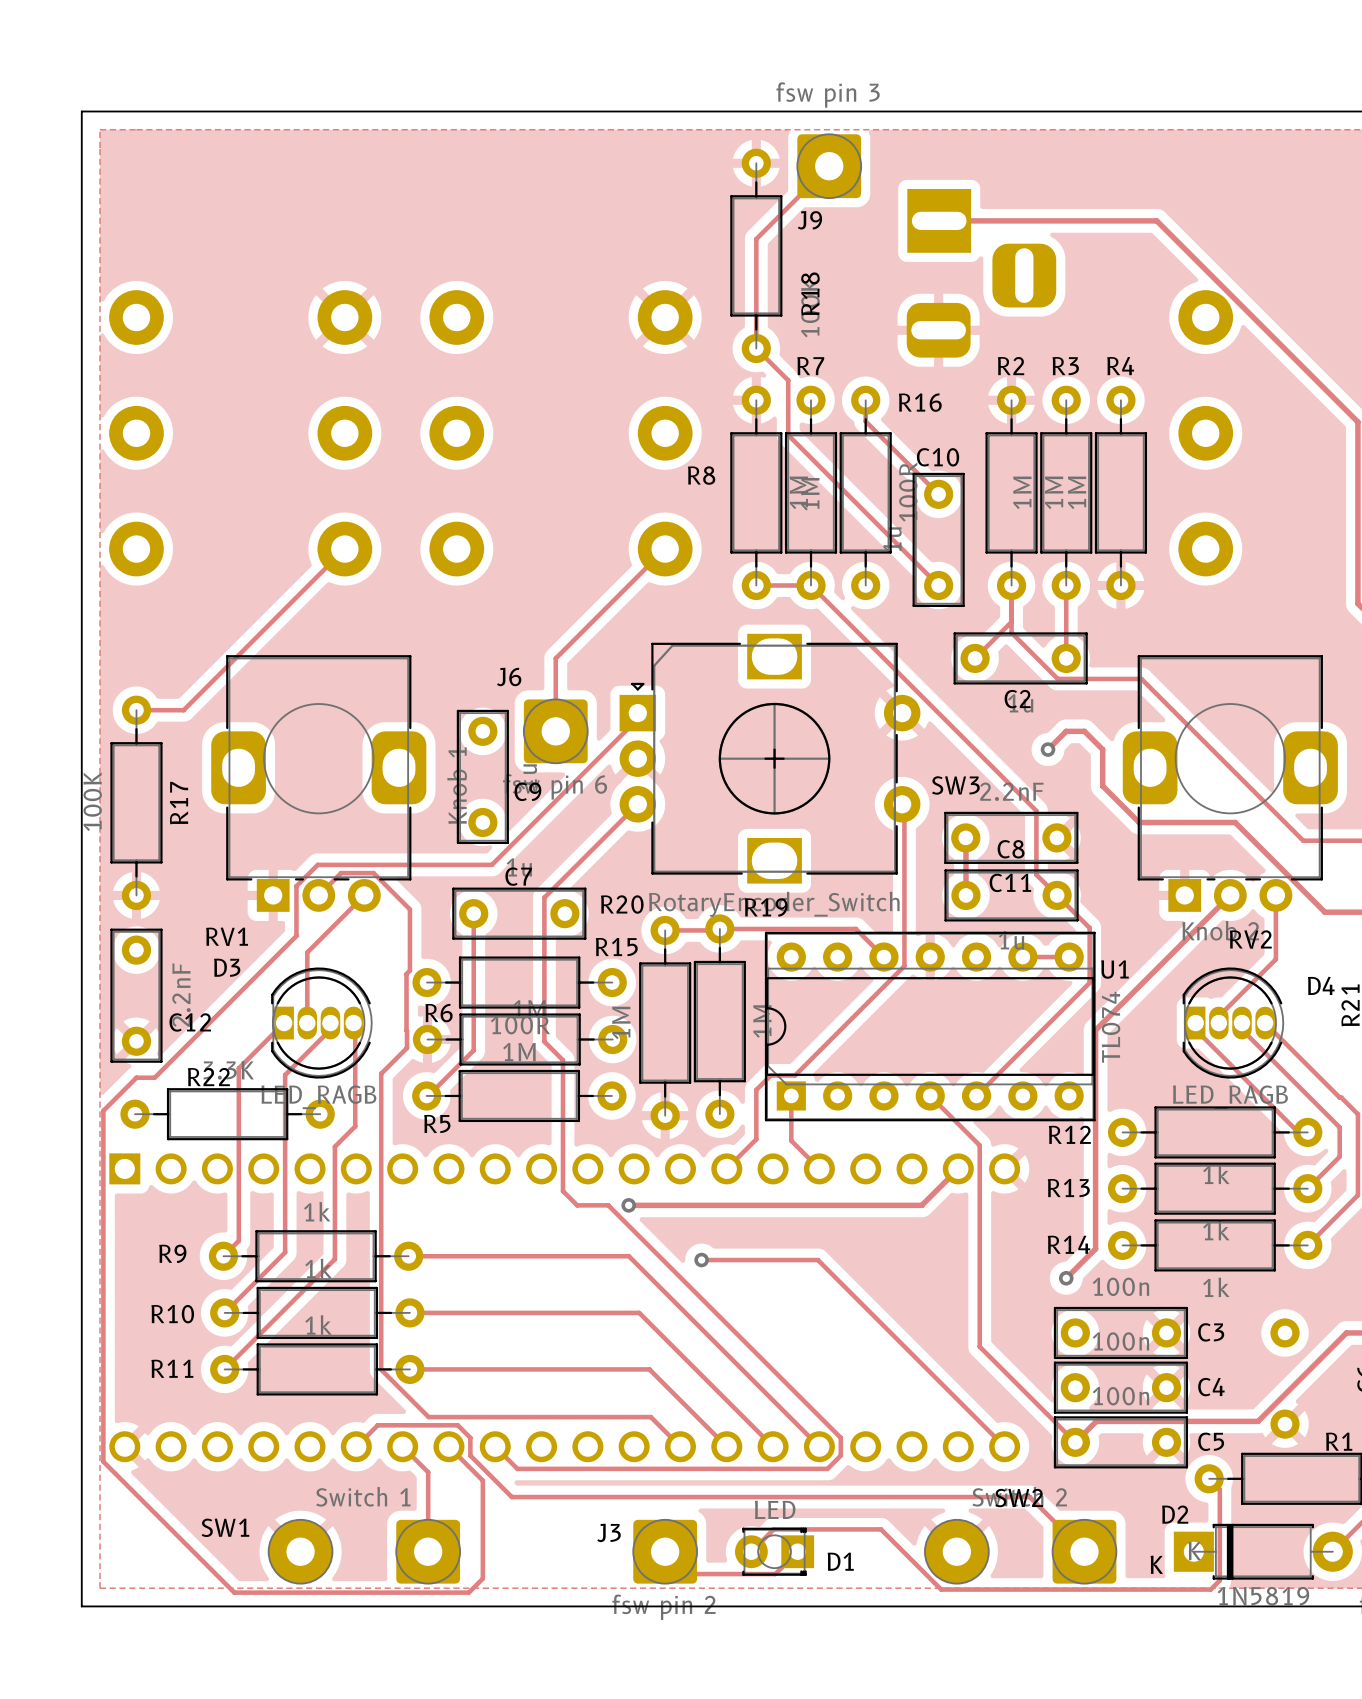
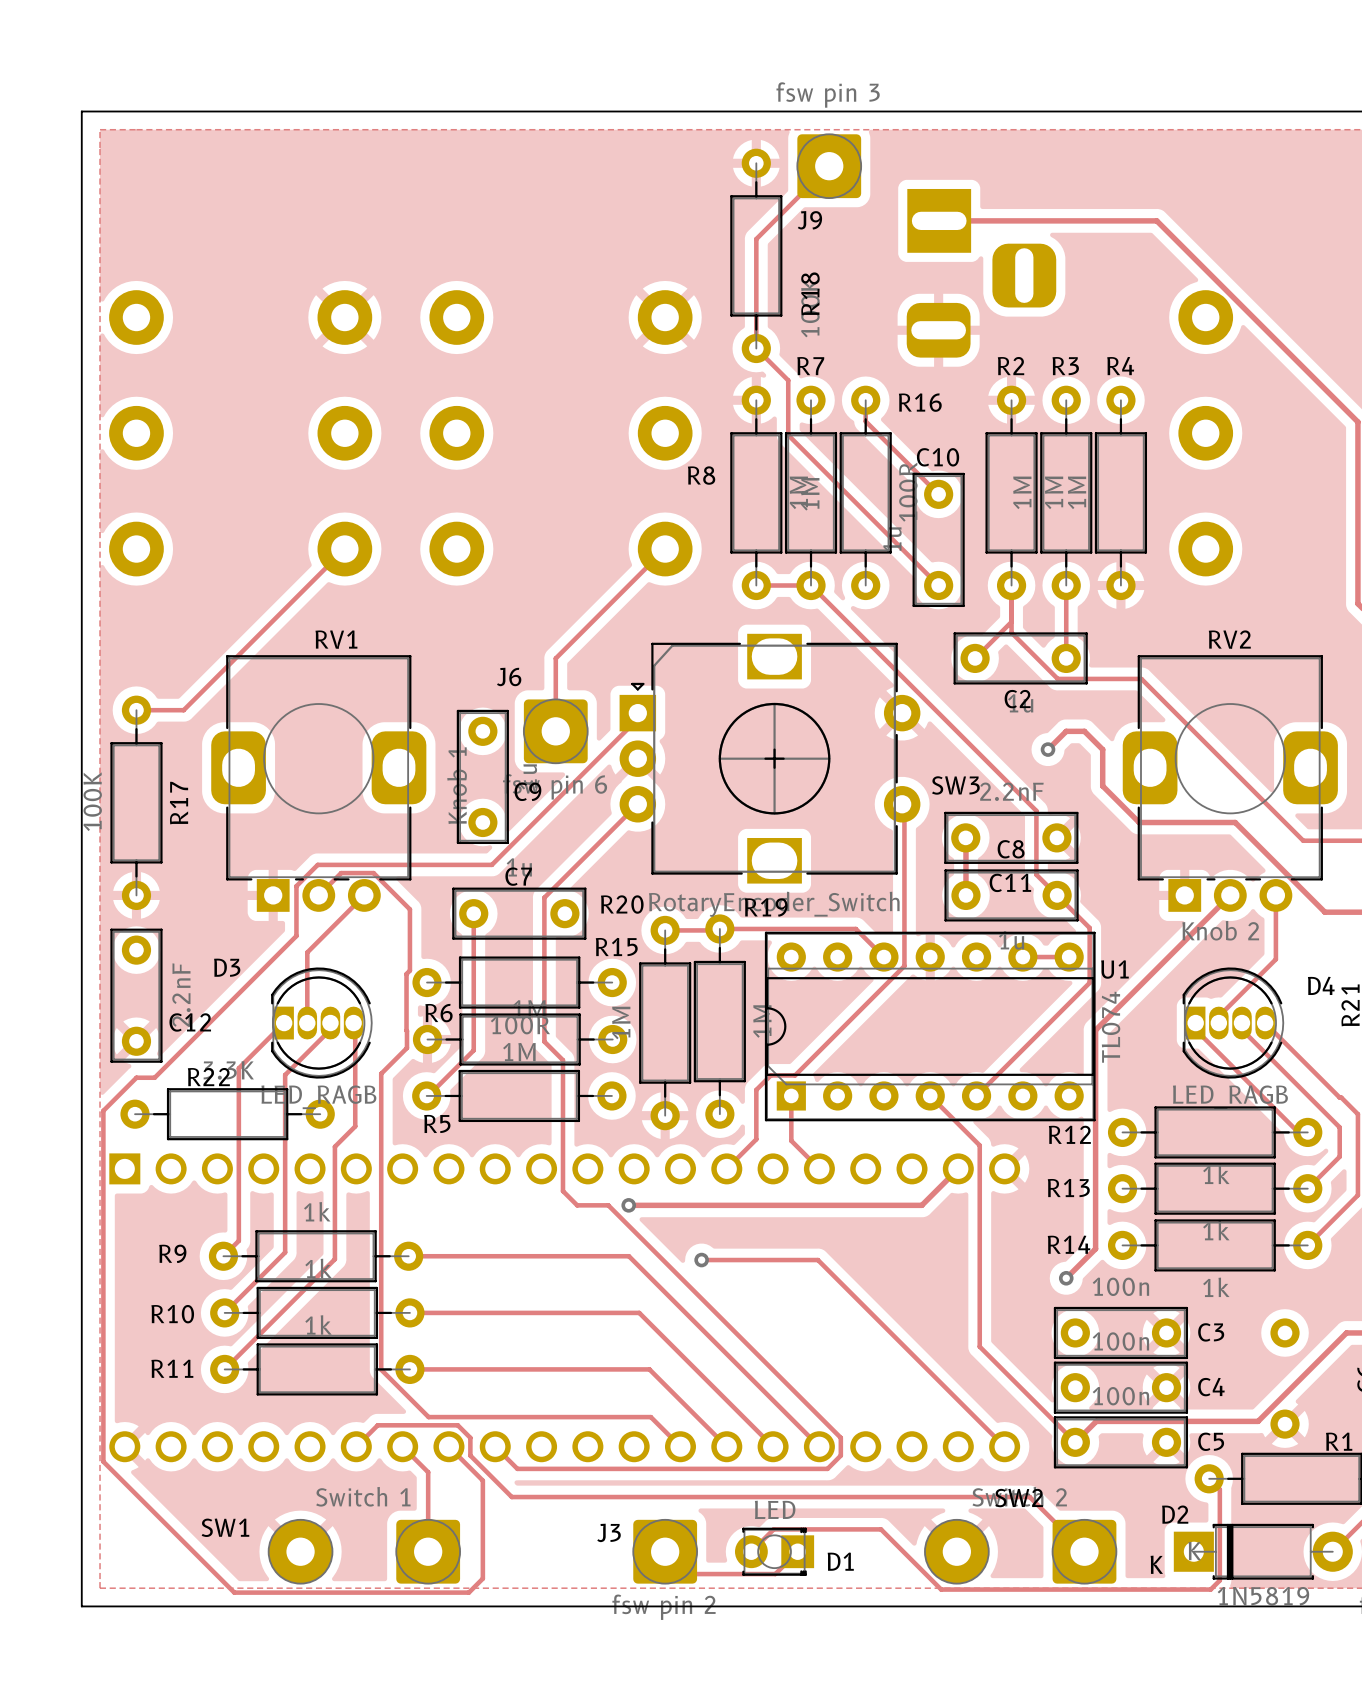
RV1 name position: RV1 (227, 936) -> RV1 (336, 639)
RV2 name position: RV2 (1250, 939) -> RV2 (1229, 639)

